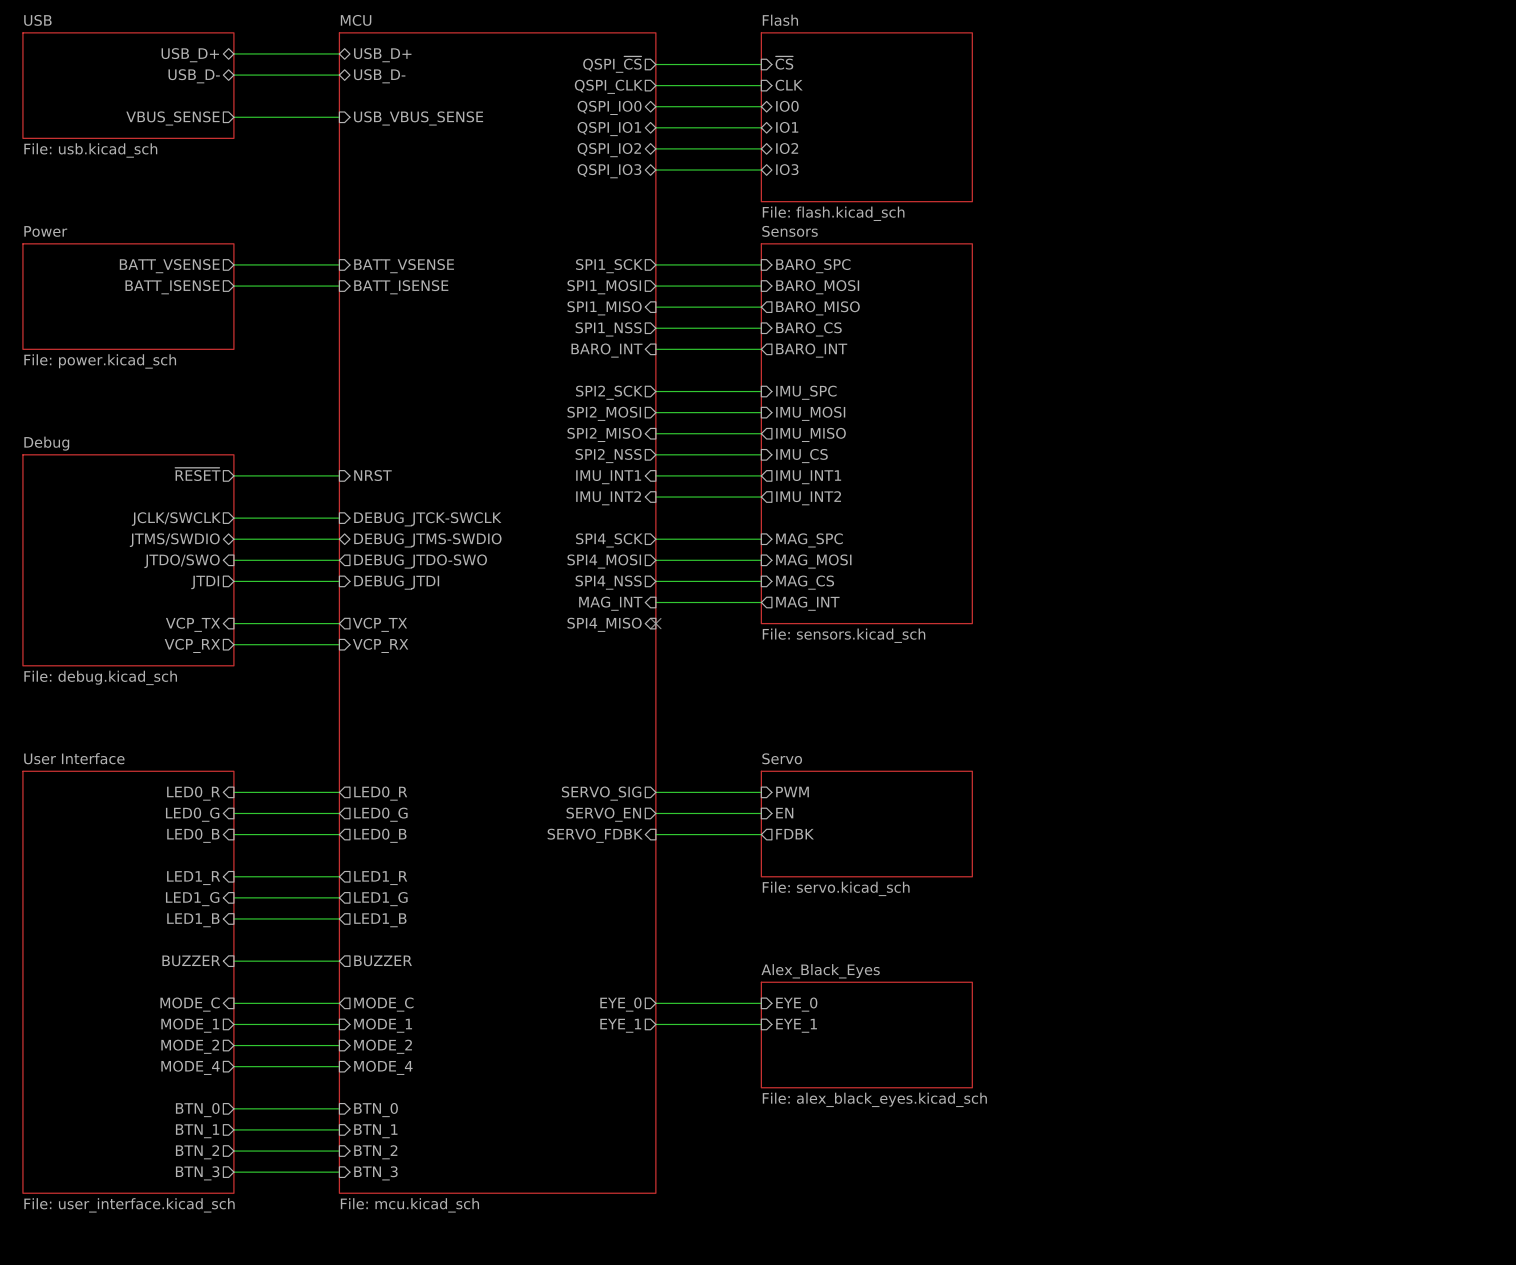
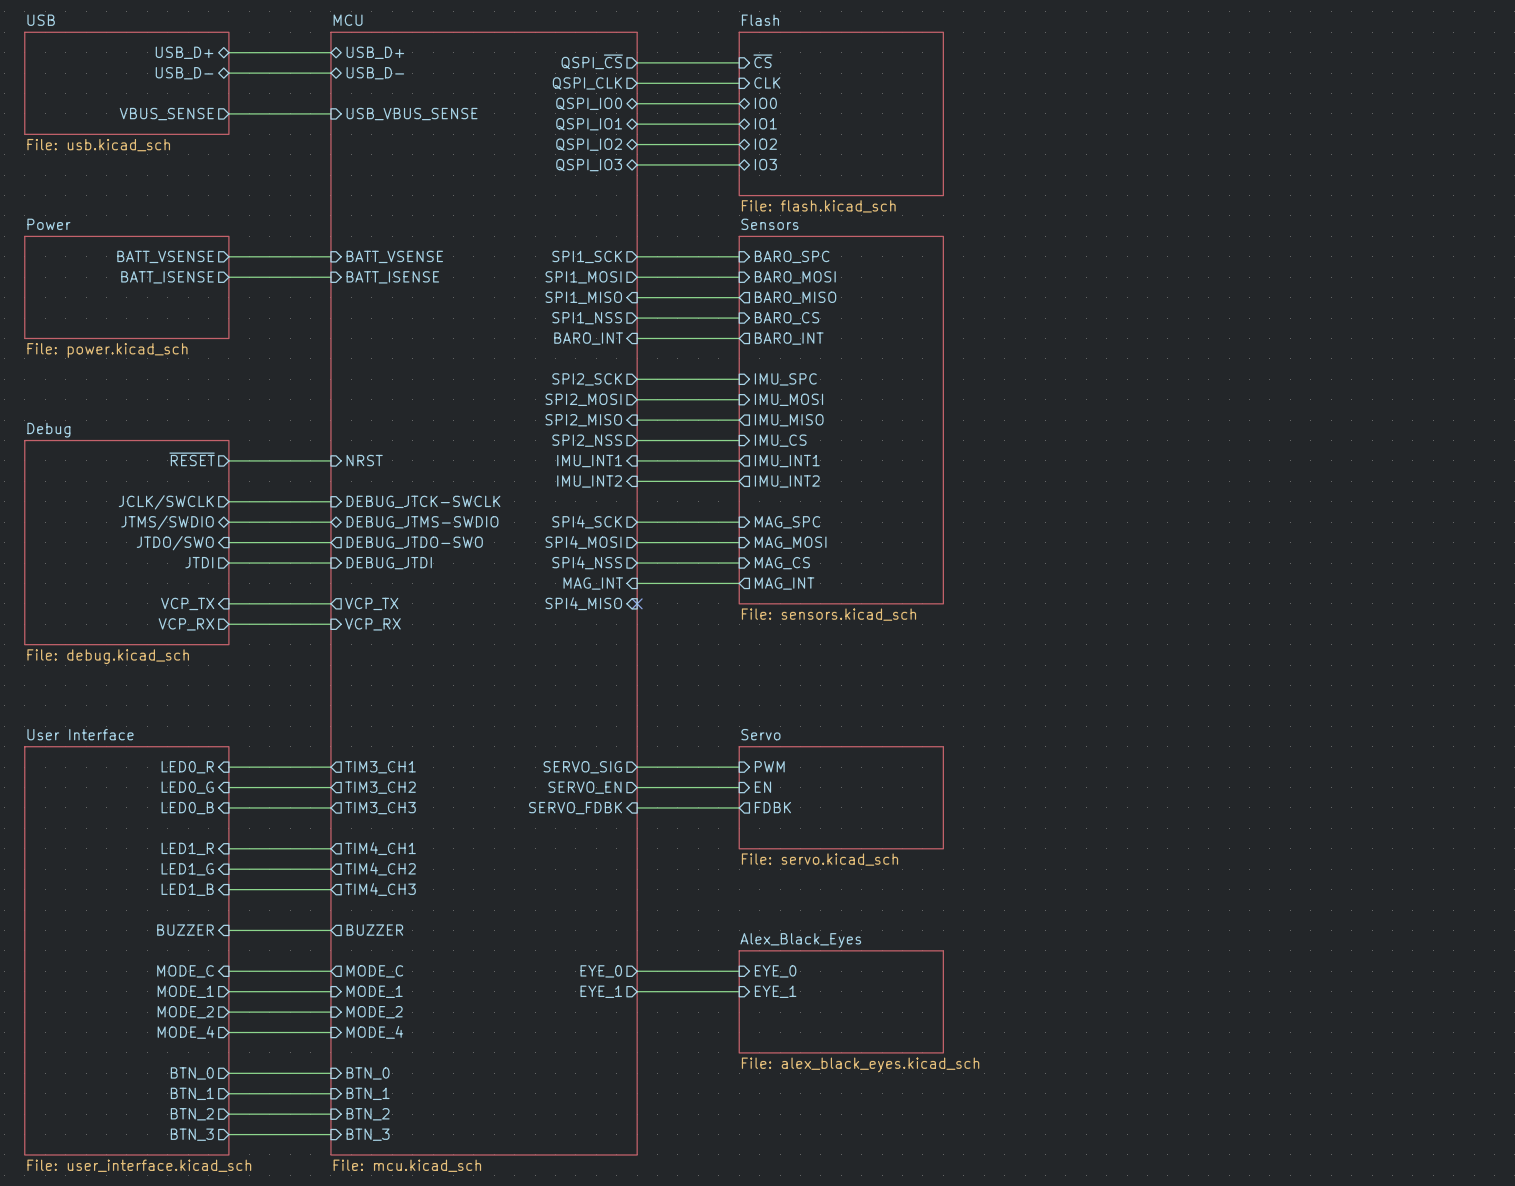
sheet pin: LED0_R (380, 793) -> TIM3_CH1 (380, 767)
sheet pin: LED0_G (380, 814) -> TIM3_CH2 (380, 787)
sheet pin: LED0_B (380, 835) -> TIM3_CH3 (380, 808)
sheet pin: LED1_R (380, 878) -> TIM4_CH1 (380, 848)
sheet pin: LED1_G (380, 899) -> TIM4_CH2 (380, 869)
sheet pin: LED1_B (380, 920) -> TIM4_CH3 (380, 889)

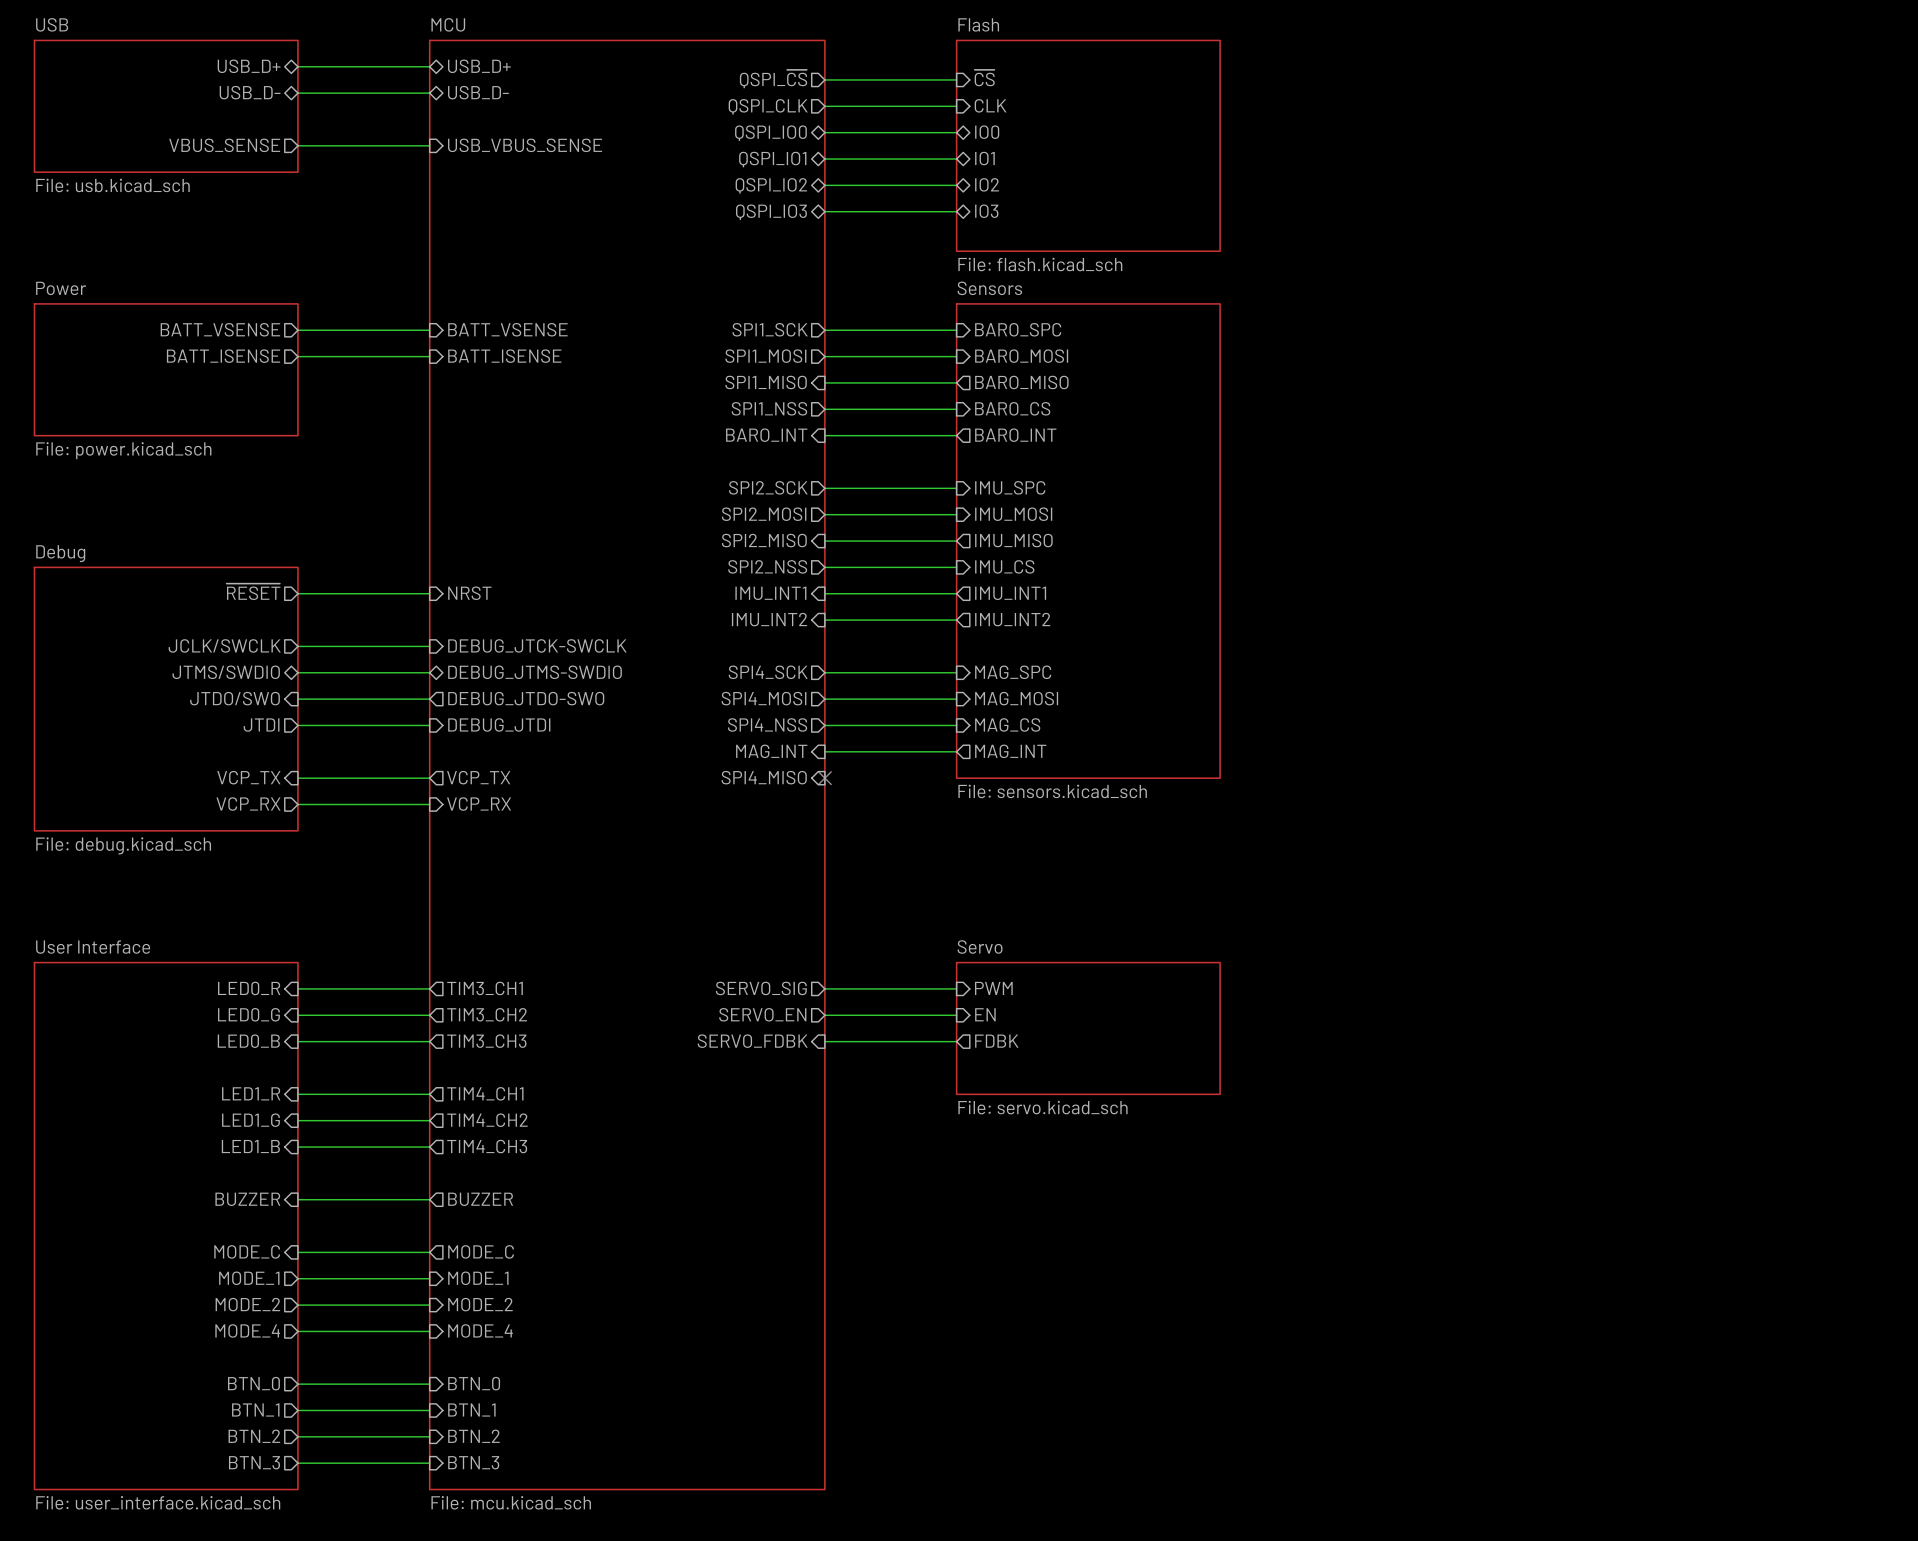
sheet pin: EYE_0 (601, 971) -> none
wire: (637, 971) (739, 971) -> none
sheet pin: EYE_0 (775, 971) -> none
sheet pin: EYE_1 (601, 991) -> none
wire: (637, 991) (739, 991) -> none
sheet pin: EYE_1 (775, 991) -> none
sheet Alex_Black_Eyes: File: alex_black_eyes.kicad_sch (841, 1001) -> none

